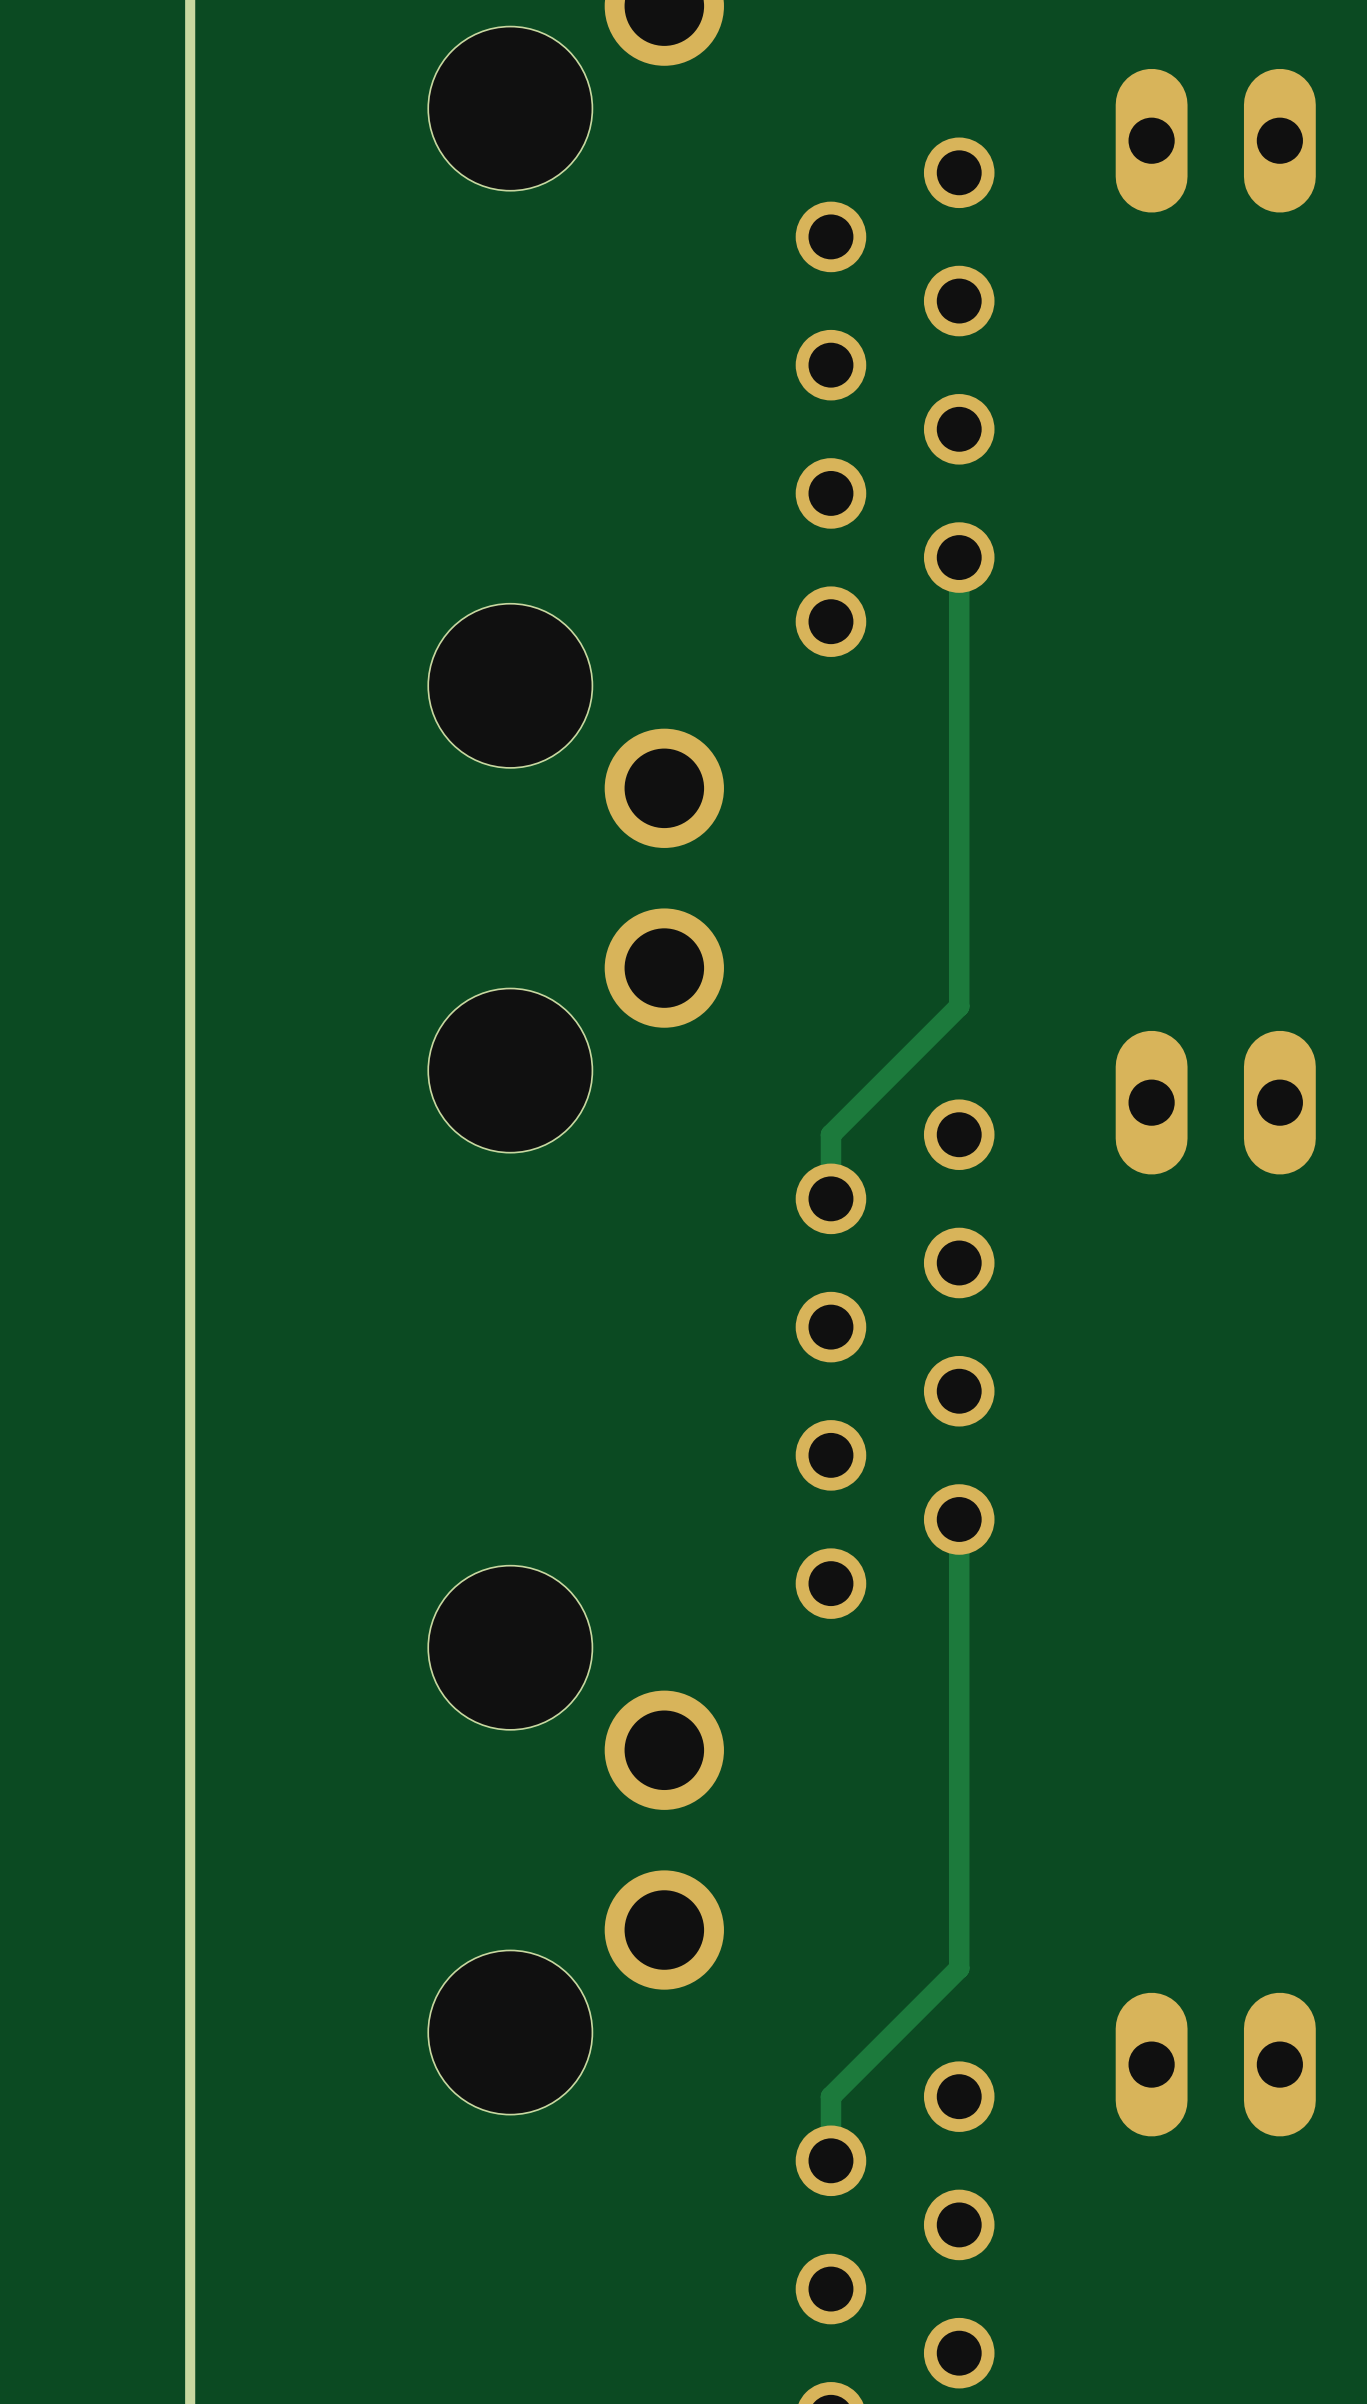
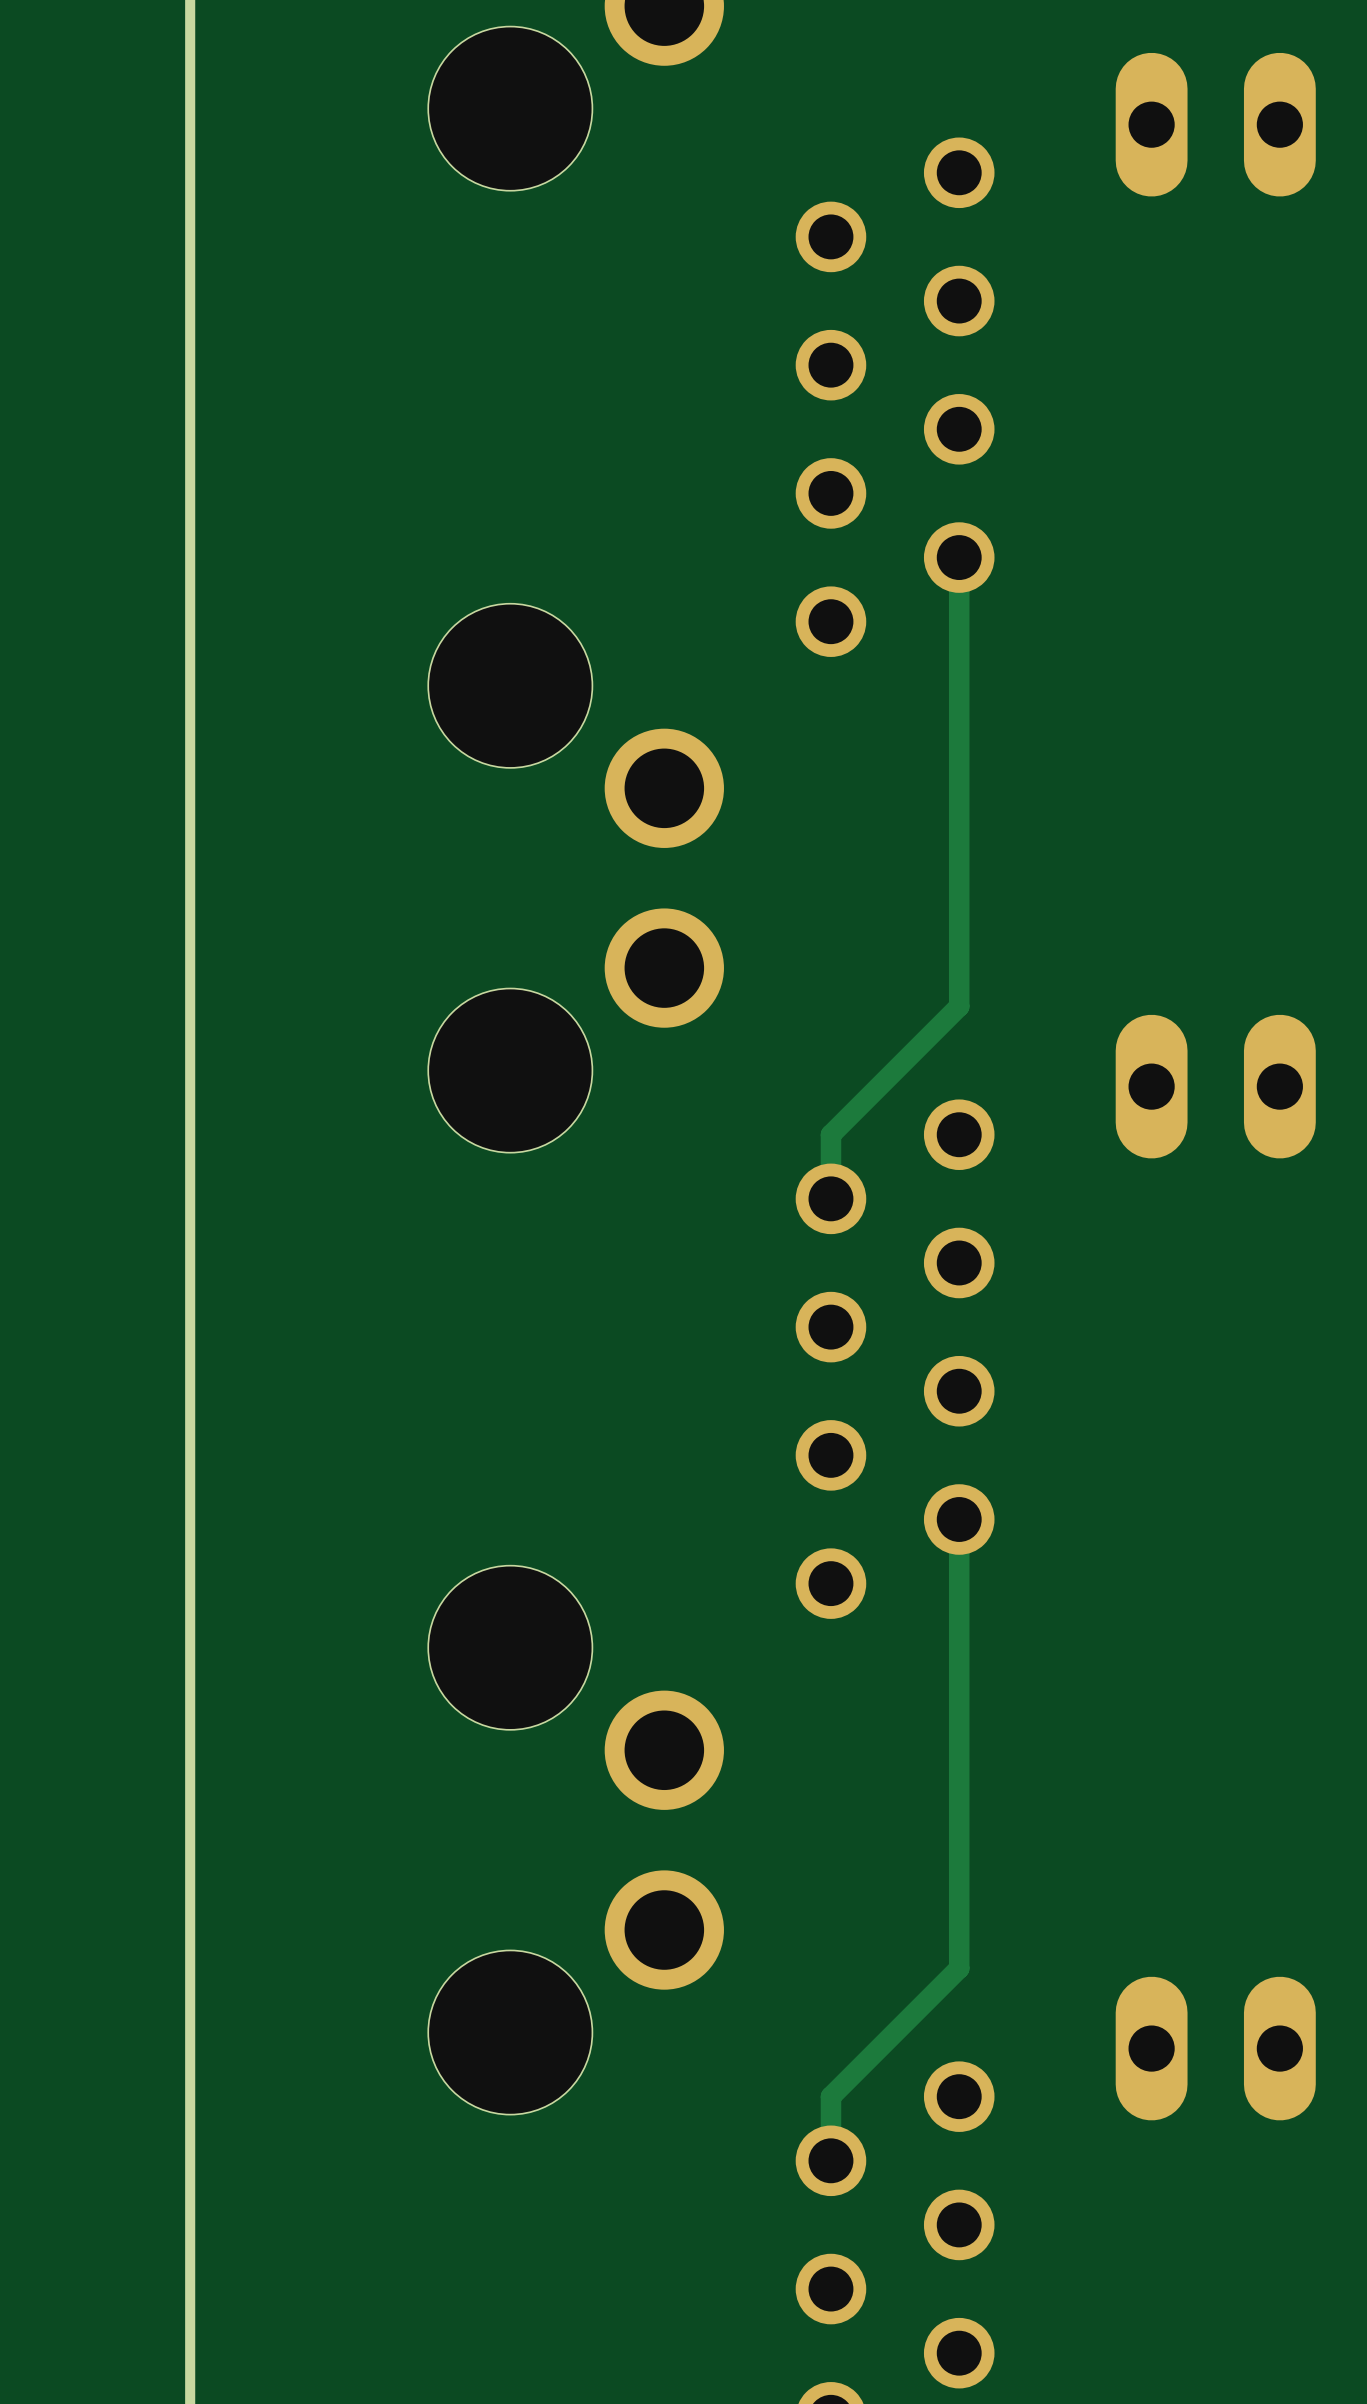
part position: (1215, 140) -> (1215, 124)
part position: (1215, 1102) -> (1215, 1086)
part position: (1215, 2064) -> (1215, 2048)

